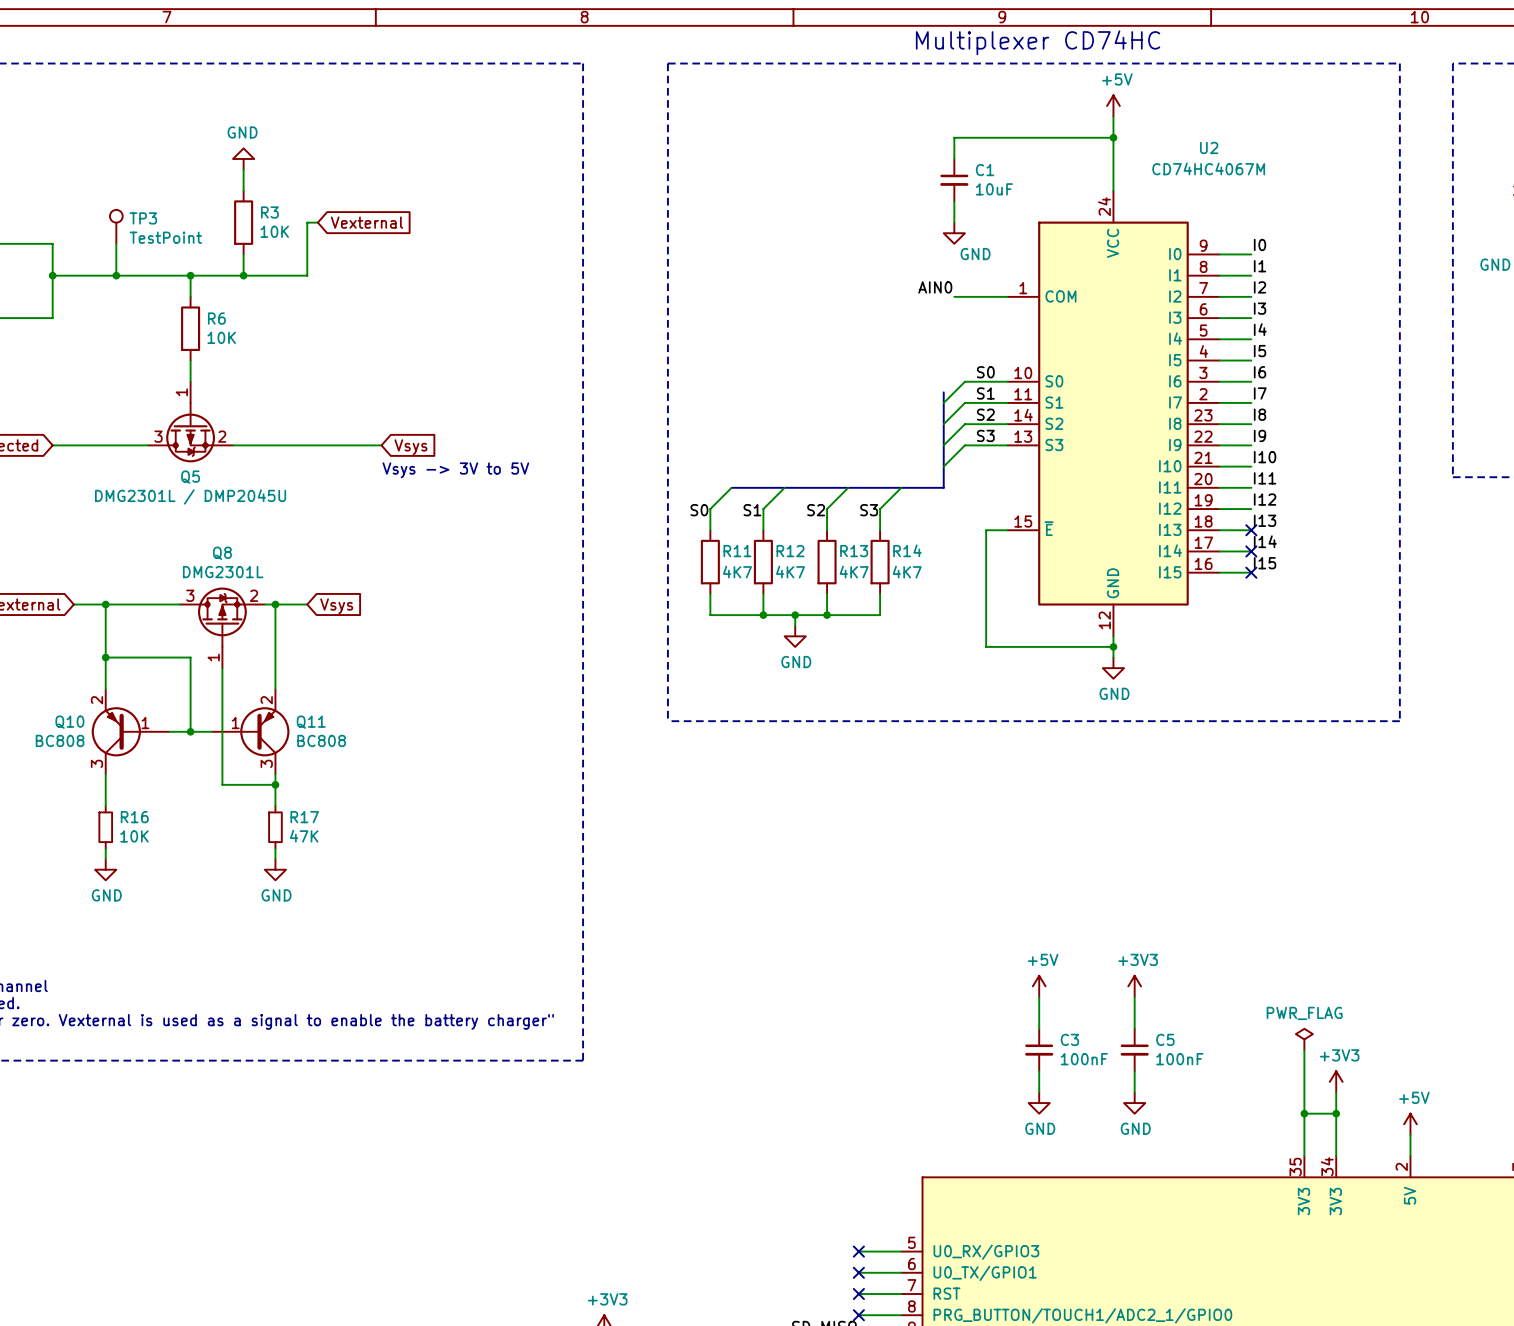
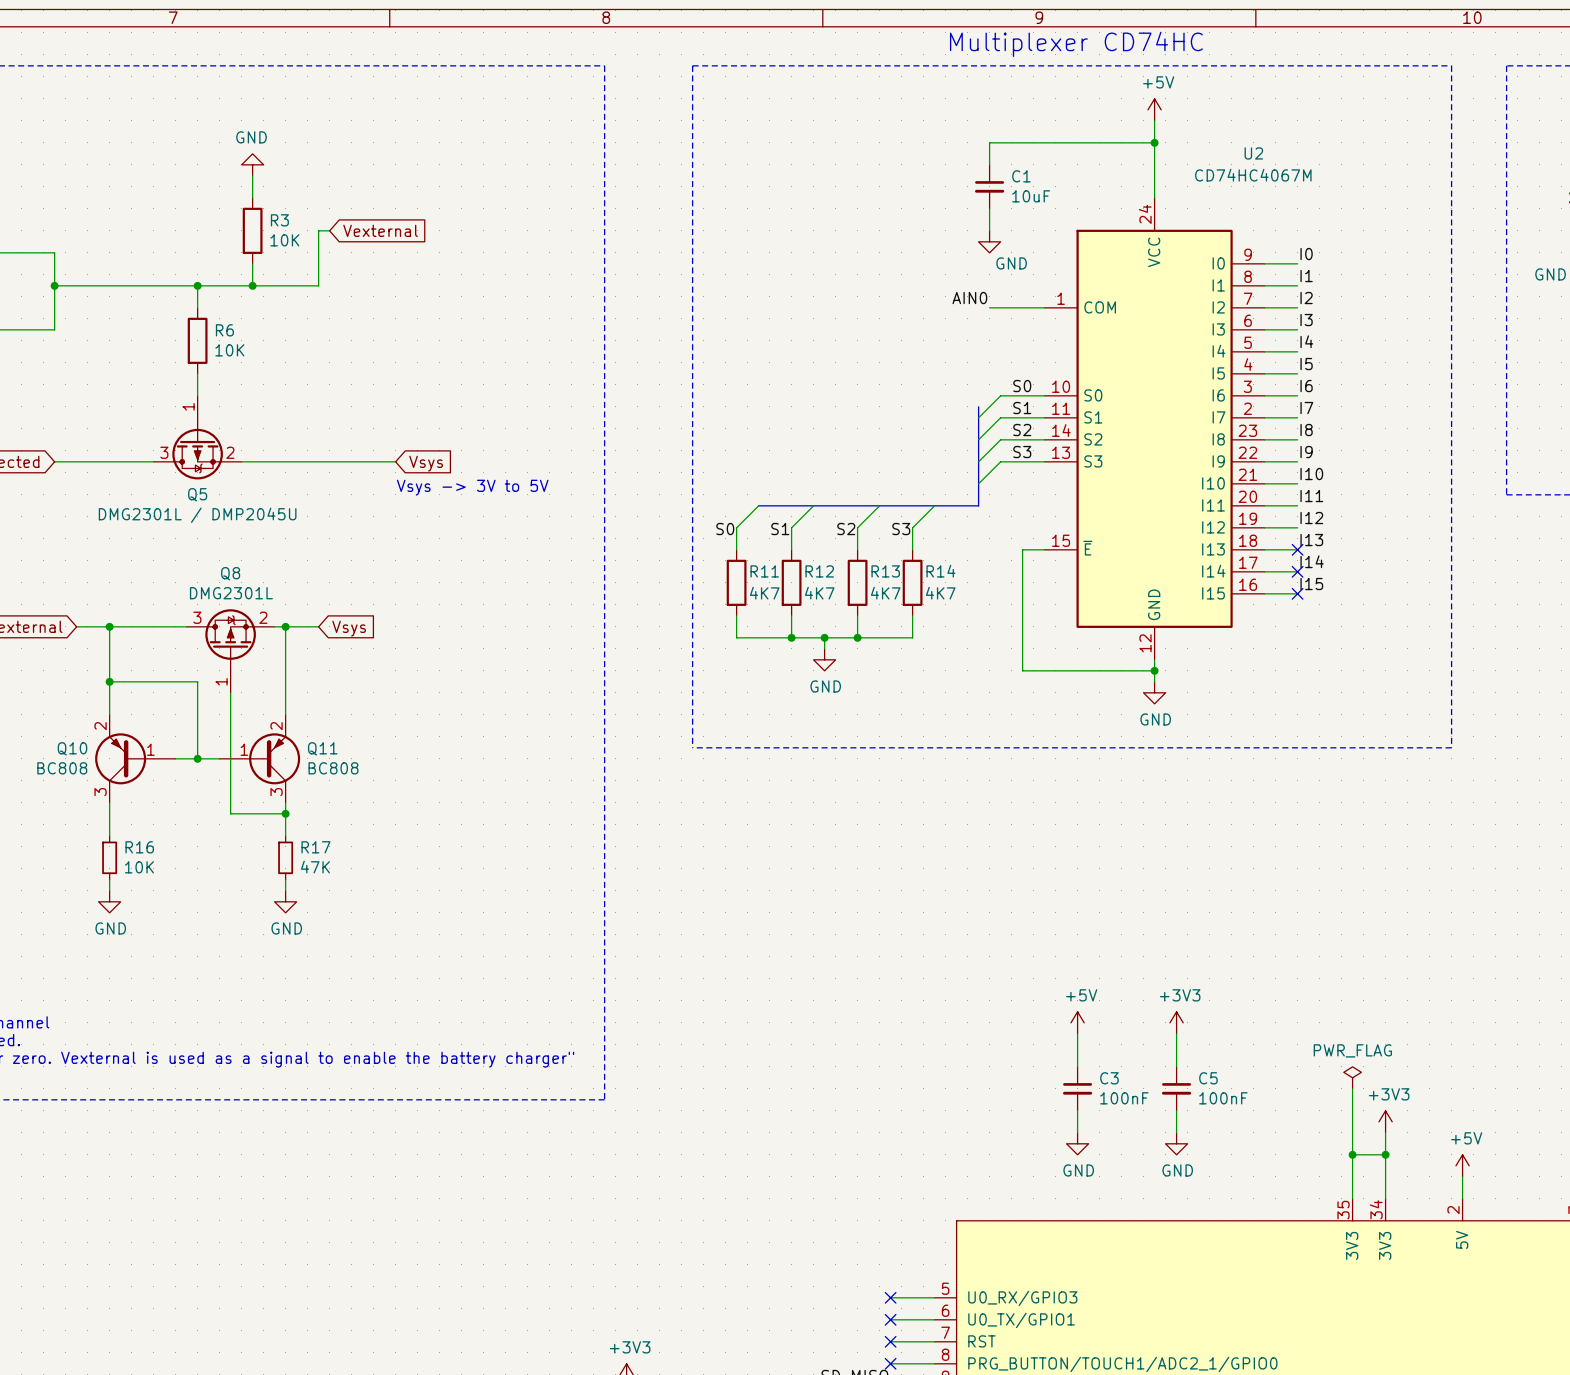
TP3: TestPoint (116, 226) -> none
wire: (116, 243) (116, 275) -> none
junction: (116, 275) -> none

